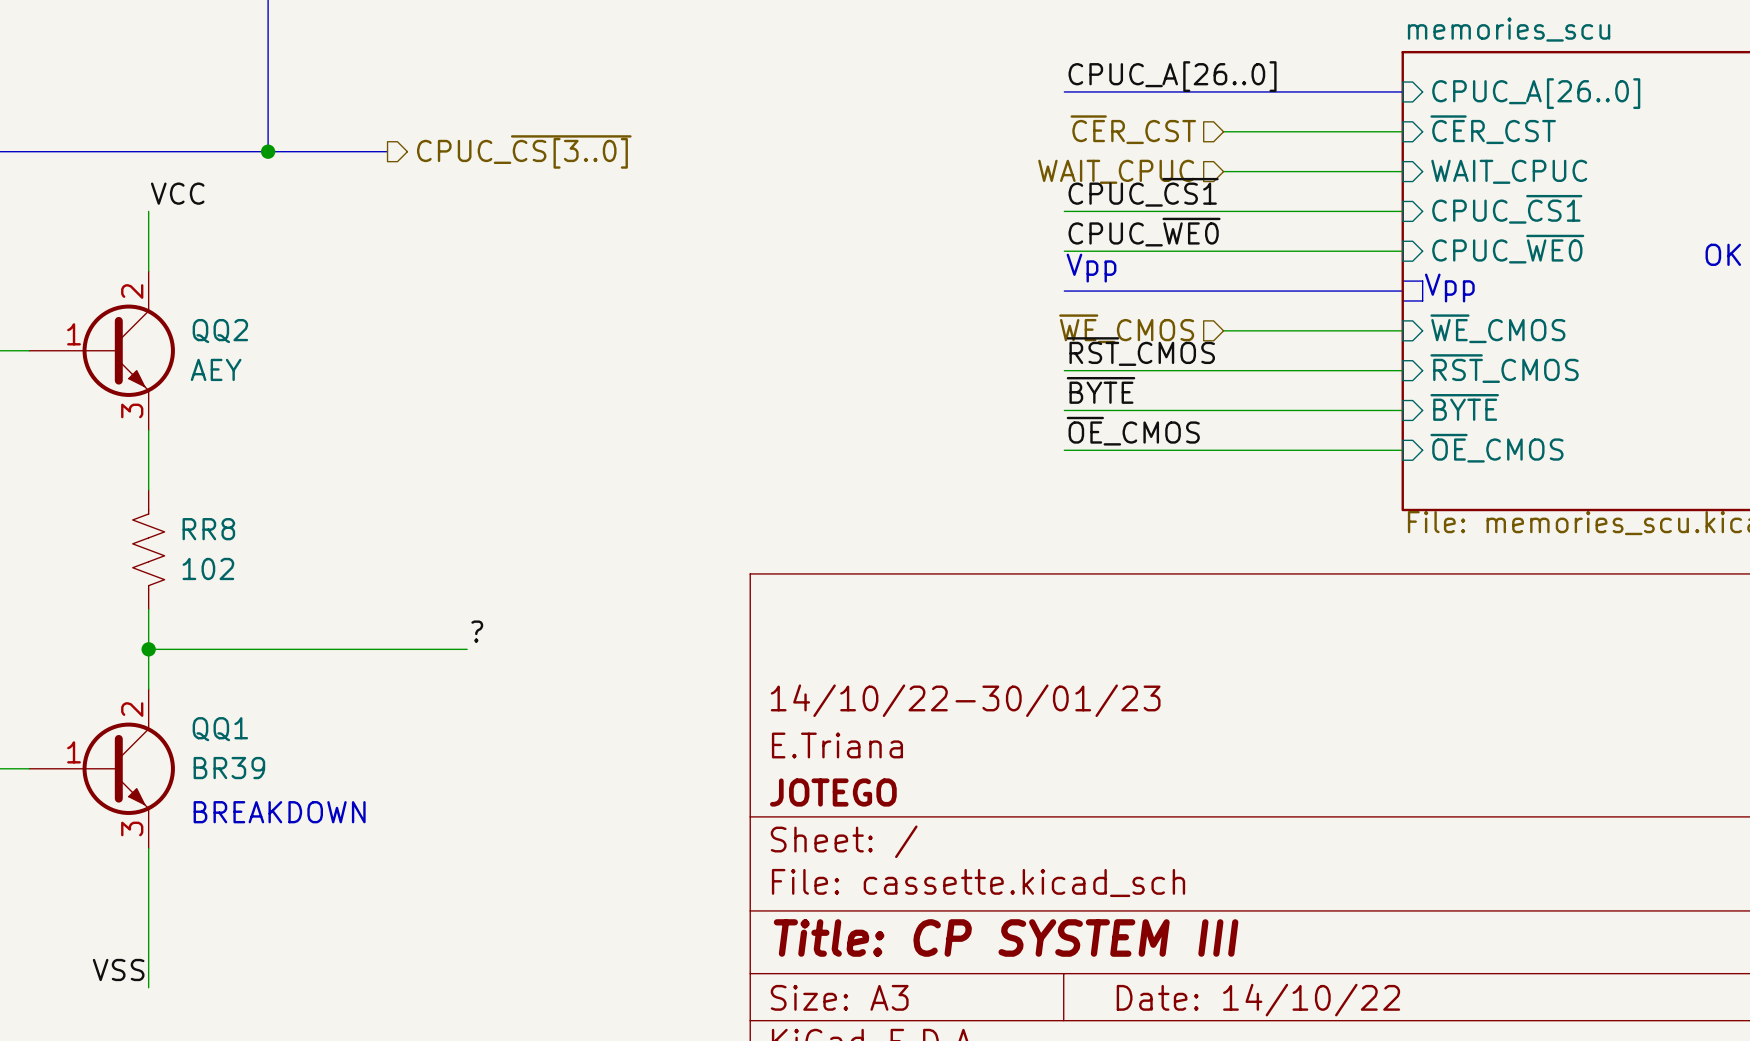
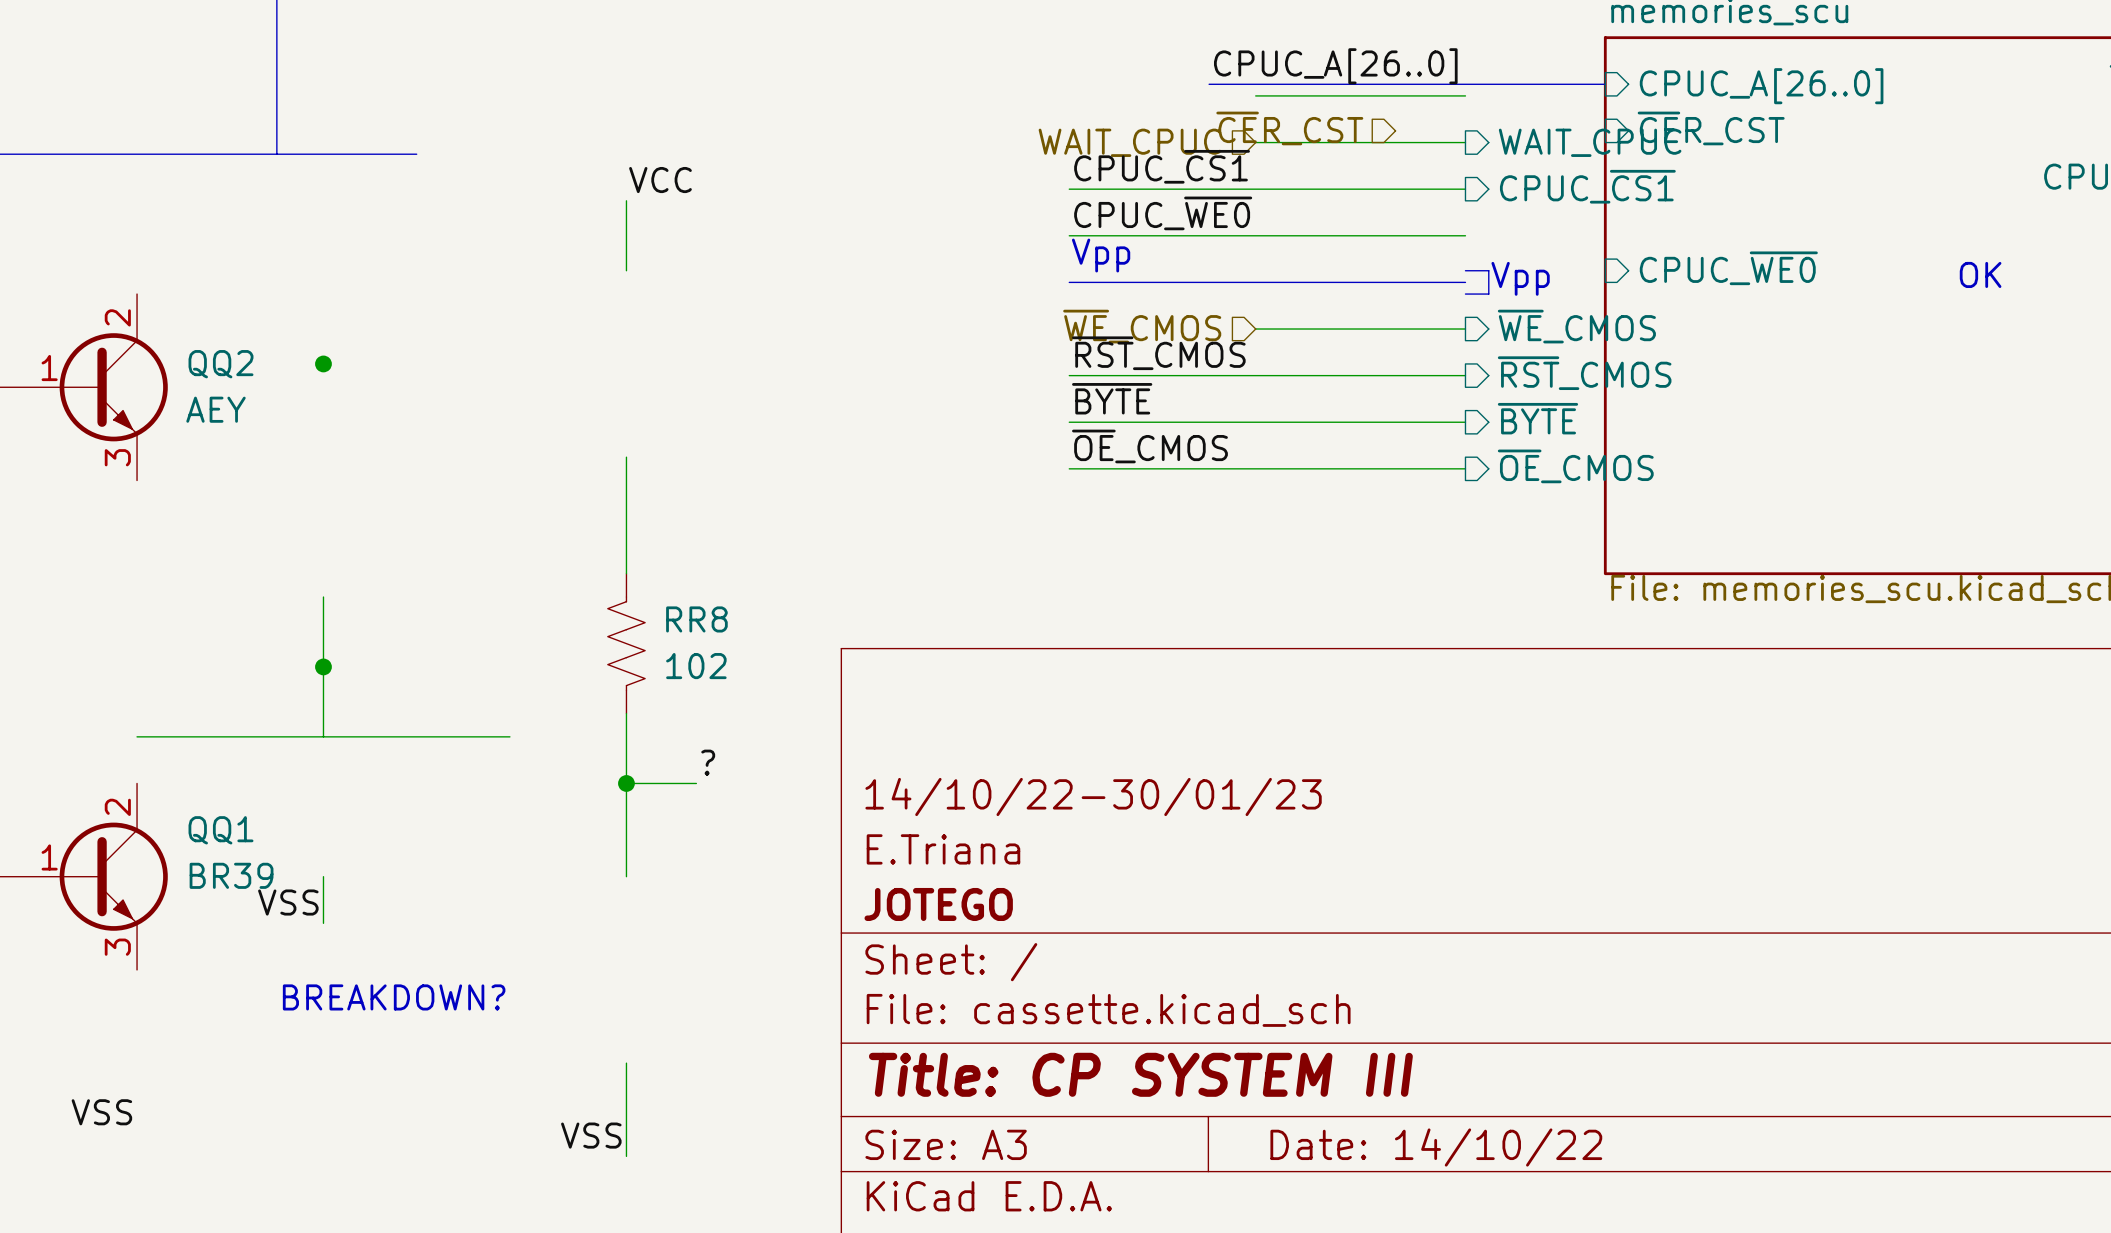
wire: (1223, 131) (1402, 131) -> (1255, 95) (1465, 95)
junction: (268, 151) -> none
hierarchical label: CPUC_~{CS[3..0]} (524, 151) -> none
hierarchical label position: WAIT_CPUC (1116, 171) -> WAIT_CPUC (1129, 142)
wire: (1223, 171) (1402, 171) -> (1255, 142) (1465, 142)
sheet pin position: WAIT_CPUC (1509, 171) -> WAIT_CPUC (1590, 142)
label: none -> VCC (660, 180)
wire: none -> (626, 200) (626, 270)
label position: CPUC_~{CS1} (1143, 192) -> CPUC_~{CS1} (1162, 166)
label: VCC (177, 193) -> none
sheet pin position: CPUC_~{CS1} (1507, 209) -> CPUC_~{CS1} (1587, 186)
wire: (148, 211) (148, 271) -> none
wire: (1064, 211) (1402, 211) -> (1069, 189) (1465, 189)
label position: CPUC_~{WE0} (1144, 232) -> CPUC_~{WE0} (1163, 213)
text: none -> Vpp (1101, 255)
wire: (1064, 251) (1402, 251) -> (1069, 235) (1465, 235)
text: none -> Vpp (1520, 278)
text: Vpp (1091, 268) -> none
line: (1402, 281) (1422, 281) (1422, 300) (1402, 300) -> (1465, 270) (1488, 270) (1488, 294) (1465, 294)
text: Vpp (1449, 288) -> none
line: (1064, 291) (1402, 291) -> (1069, 282) (1465, 282)
hierarchical label position: ~{WE}_CMOS (1126, 328) -> ~{WE}_CMOS (1142, 326)
sheet pin position: ~{WE}_CMOS (1497, 328) -> ~{WE}_CMOS (1576, 326)
junction: none -> (323, 363)
wire: (1223, 330) (1402, 330) -> (1255, 329) (1465, 329)
label position: ~{RST}_CMOS (1140, 351) -> ~{RST}_CMOS (1158, 353)
sheet pin position: ~{RST}_CMOS (1504, 368) -> ~{RST}_CMOS (1584, 373)
wire: (1064, 370) (1402, 370) -> (1069, 375) (1465, 375)
label position: ~{BYTE} (1100, 390) -> ~{BYTE} (1112, 398)
sheet pin position: ~{BYTE} (1464, 407) -> ~{BYTE} (1537, 418)
wire: none -> (626, 457) (626, 573)
wire: (1064, 410) (1402, 410) -> (1069, 422) (1465, 422)
wire: (148, 430) (148, 490) -> none
label position: ~{OE}_CMOS (1133, 431) -> ~{OE}_CMOS (1149, 446)
sheet pin position: ~{OE}_CMOS (1496, 448) -> ~{OE}_CMOS (1575, 466)
wire: (1064, 450) (1402, 450) -> (1069, 468) (1465, 468)
wire: none -> (323, 597) (323, 736)
RR8 position: (148, 549) -> (626, 643)
junction: none -> (323, 666)
wire: (148, 609) (148, 689) -> none
wire: none -> (626, 713) (626, 876)
label position: ? (477, 631) -> ? (708, 762)
junction: (148, 649) -> none
wire: none -> (626, 783) (696, 783)
junction: none -> (626, 783)
wire: none -> (323, 876) (323, 923)
label: none -> VSS (288, 902)
text: BREAKDOWN (279, 812) -> none
wire: (148, 848) (148, 987) -> none
text: none -> BREAKDOWN? (394, 997)
wire: none -> (626, 1063) (626, 1156)
label: none -> VSS (591, 1135)

